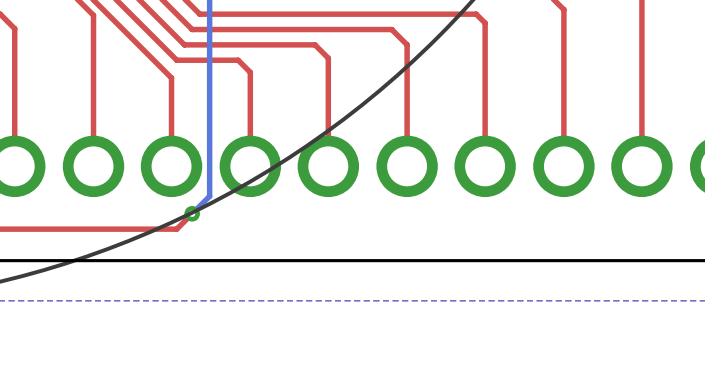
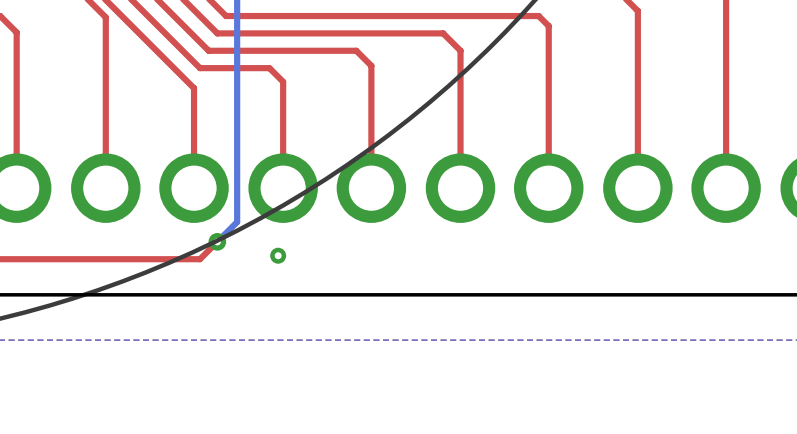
via: none -> (278, 255)

